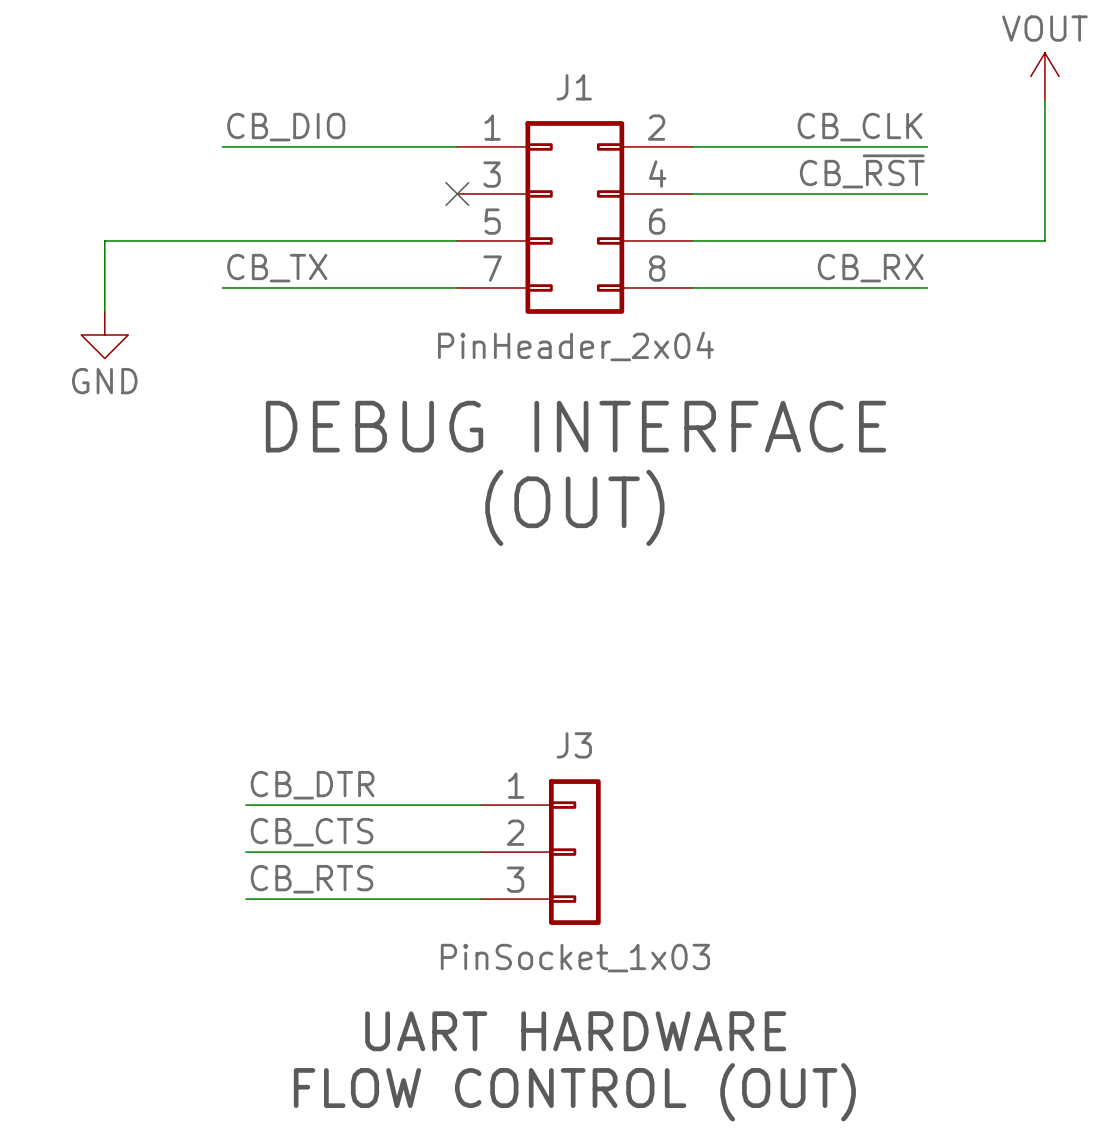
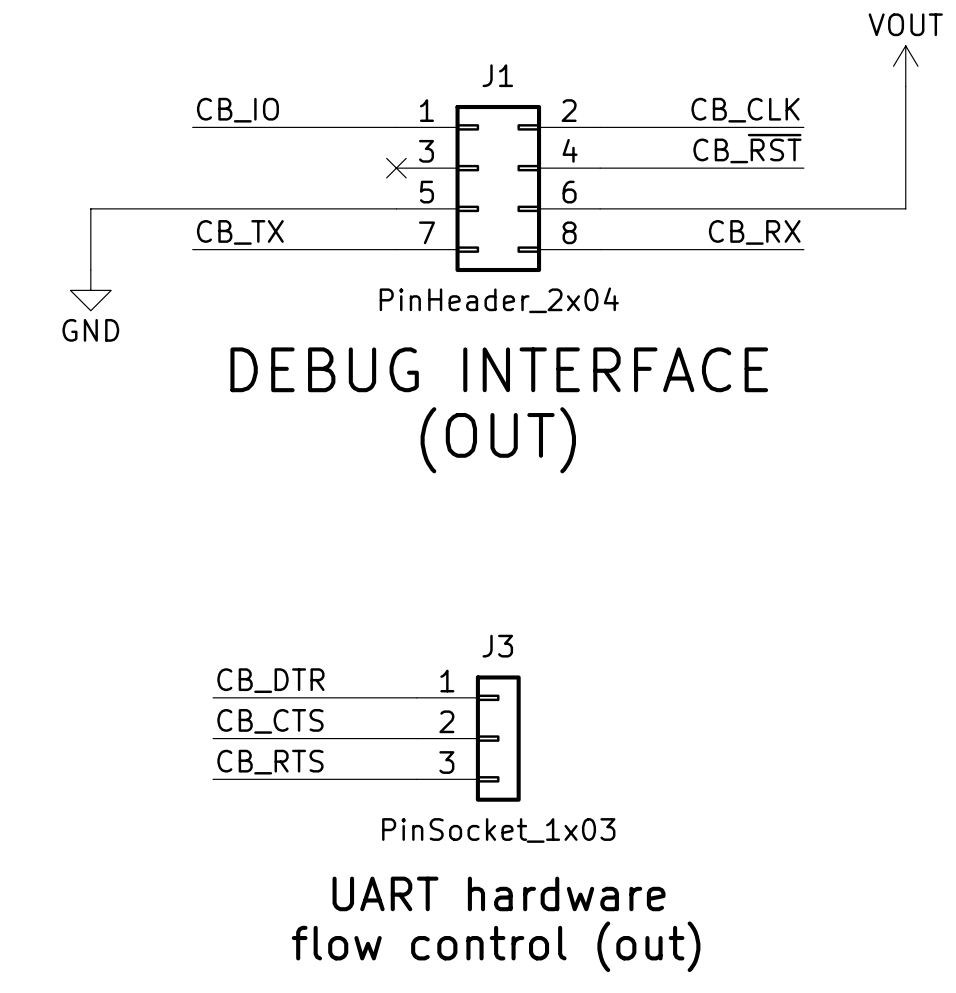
label: CB_DIO (286, 127) -> CB_IO (237, 110)
text: UART HARDWARE (575, 1031) -> UART hardware (499, 893)
text: FLOW CONTROL (OUT) (574, 1092) -> flow control (out) (496, 946)

